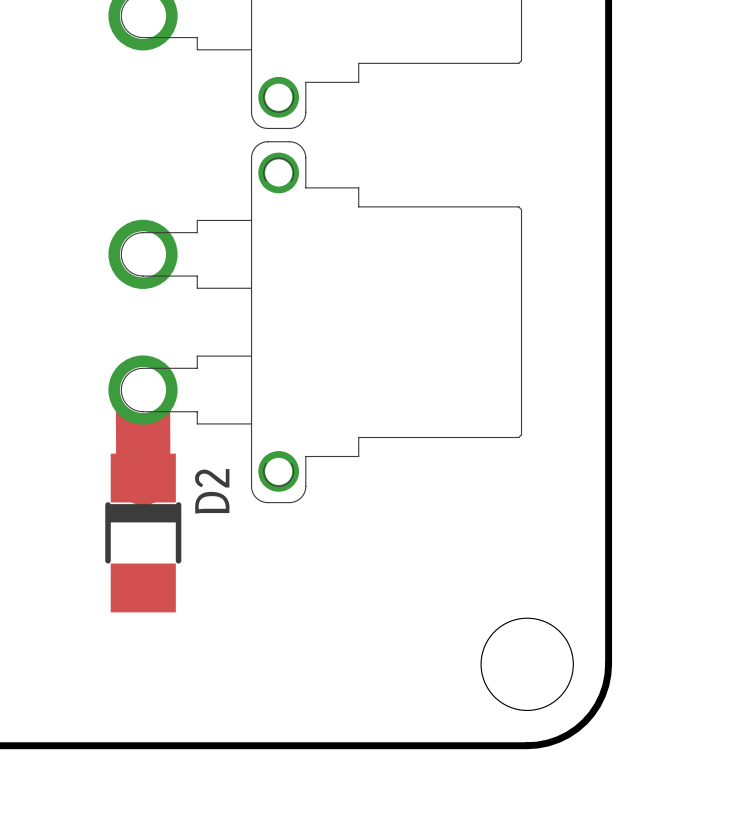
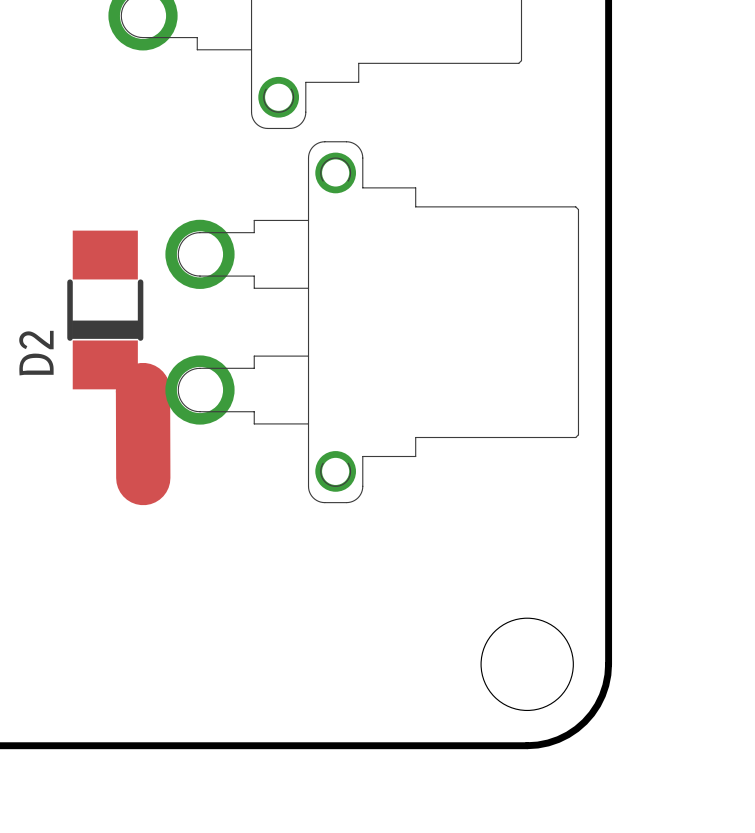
part position: (314, 322) -> (371, 322)
D2 rotation: 0° (143, 533) -> 180° (105, 309)
D2 position: (143, 533) -> (105, 309)

